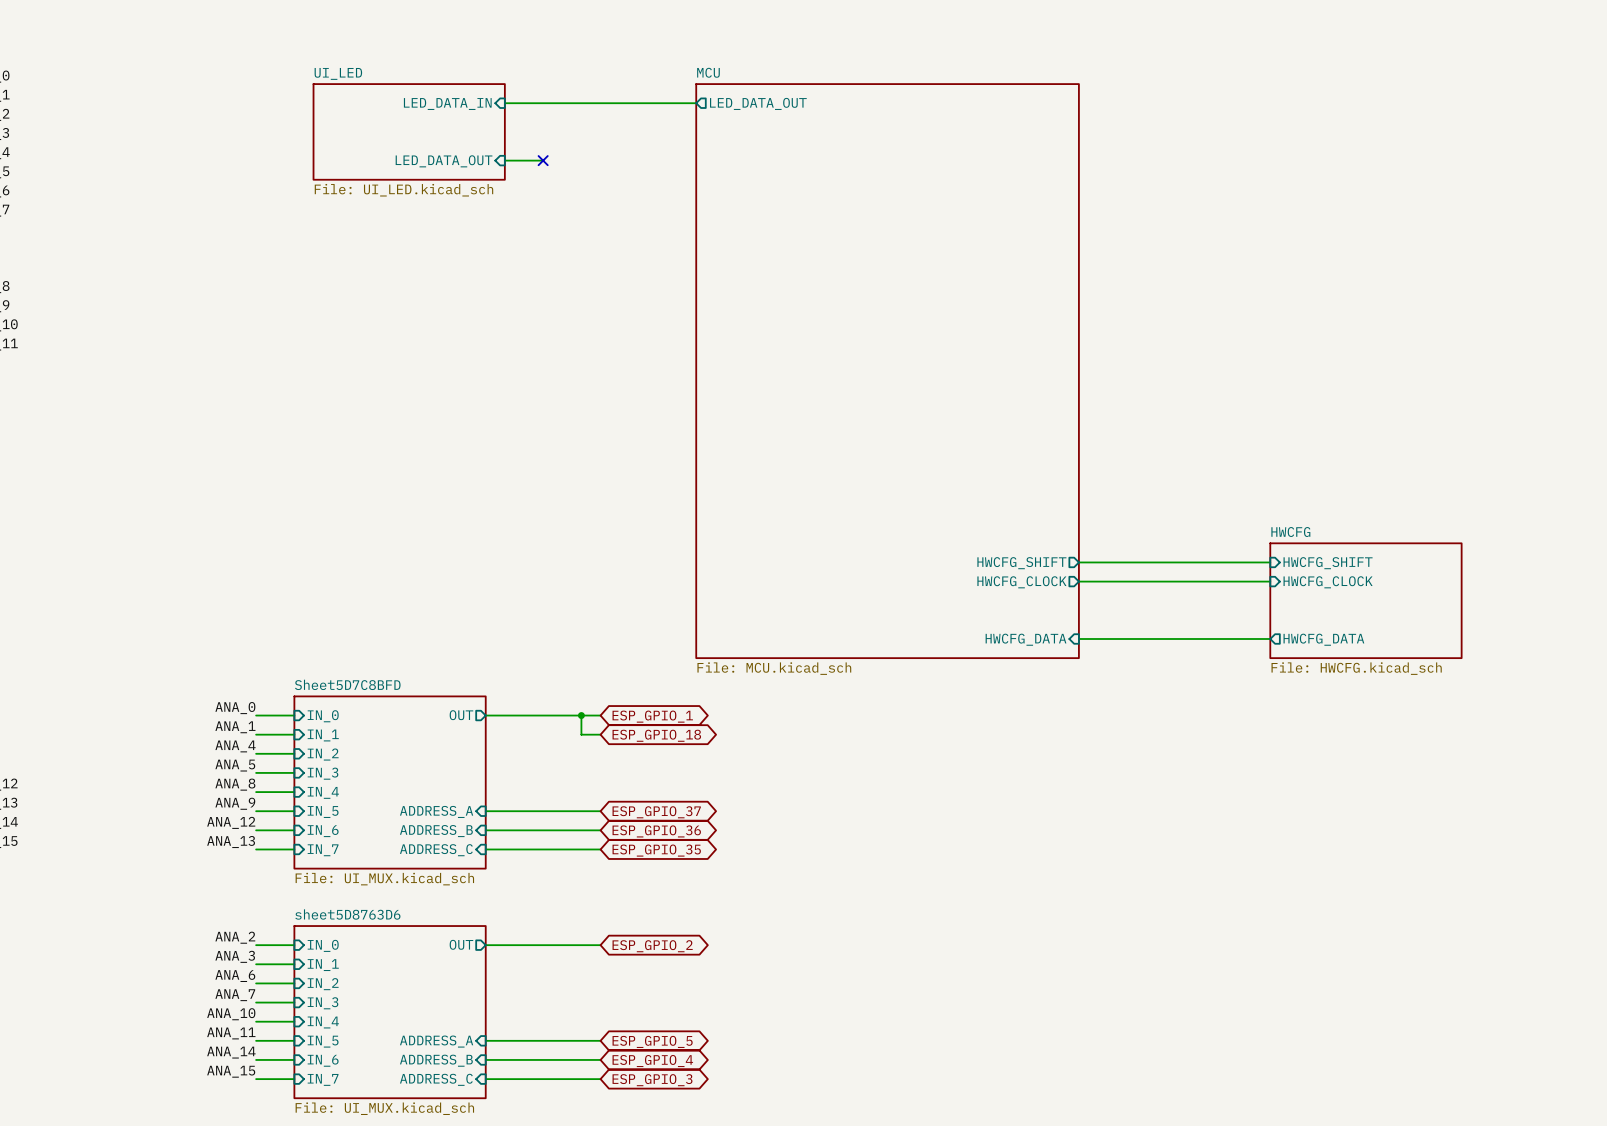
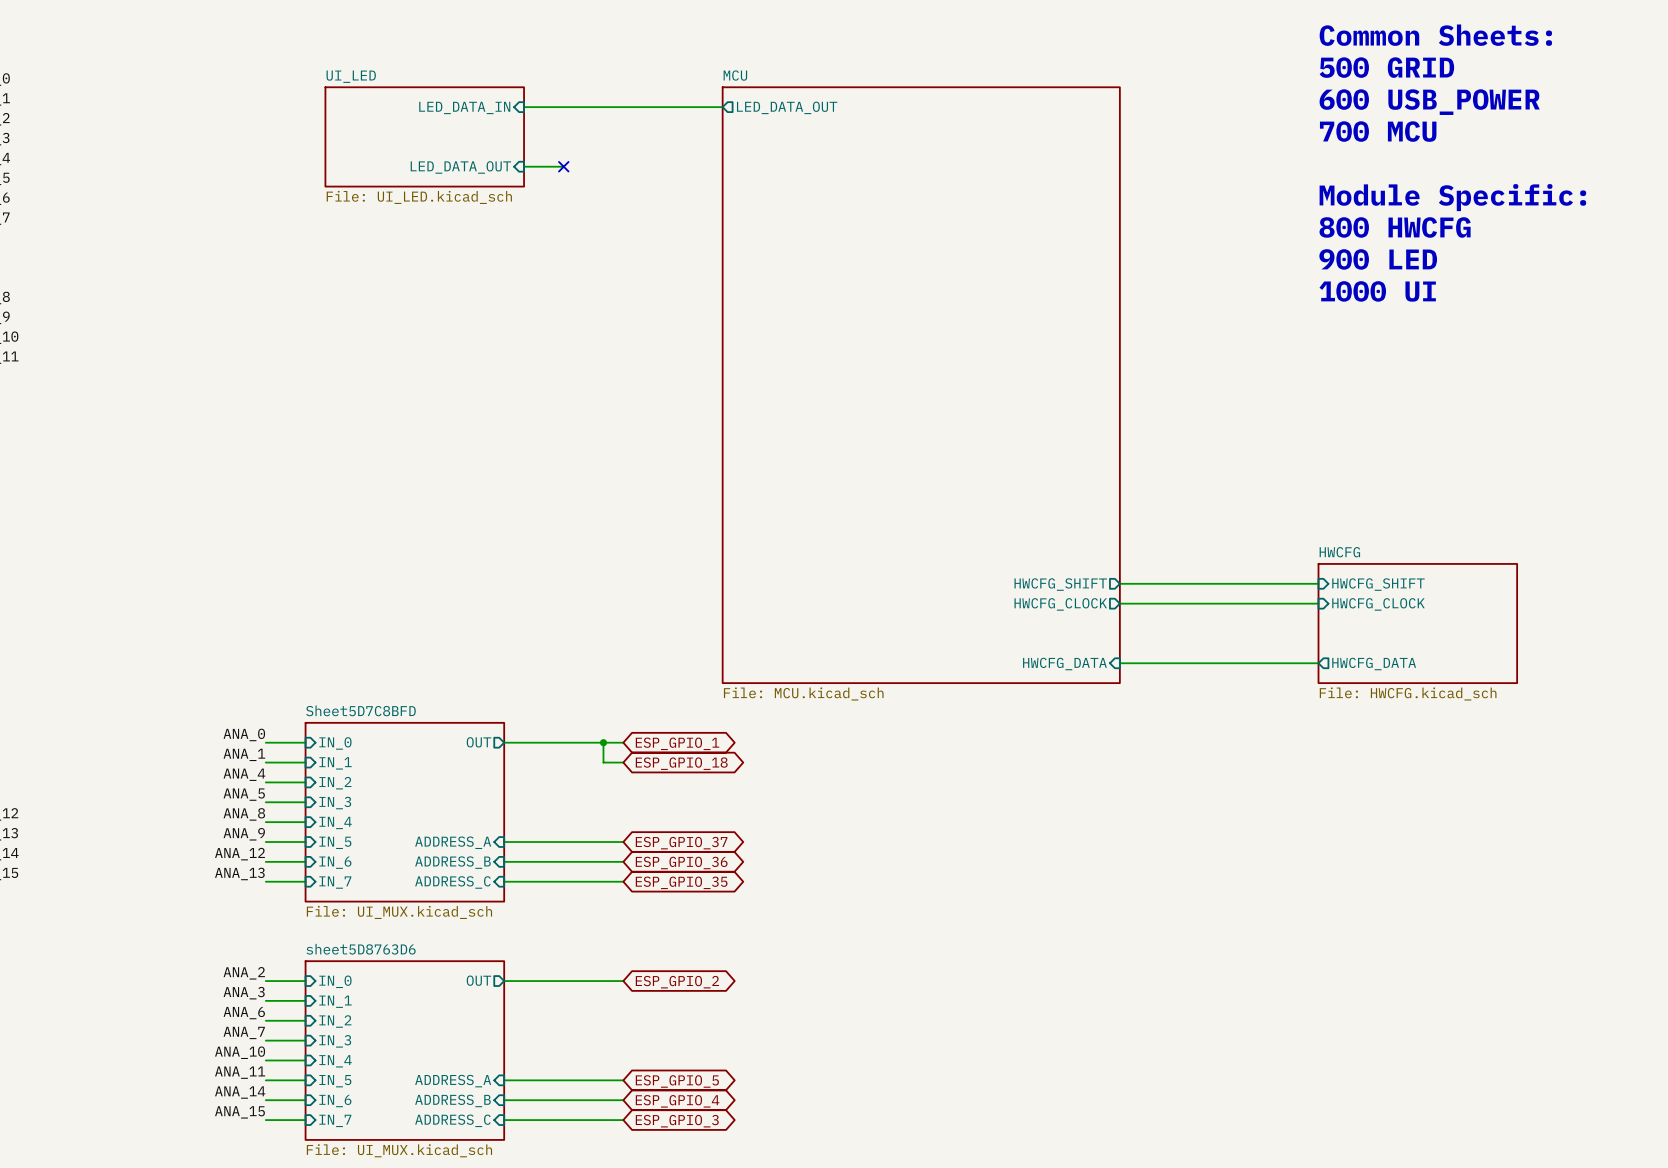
text: none -> Common Sheets: (1435, 35)
text: none -> 500 GRID (1386, 67)
text: none -> 600 USB_POWER (1429, 102)
text: none -> 700 MCU (1378, 131)
text: none -> Module Specific: (1452, 197)
text: none -> 800 HWCFG (1395, 227)
text: none -> 900 LED (1378, 259)
text: none -> 1000 UI (1377, 291)

